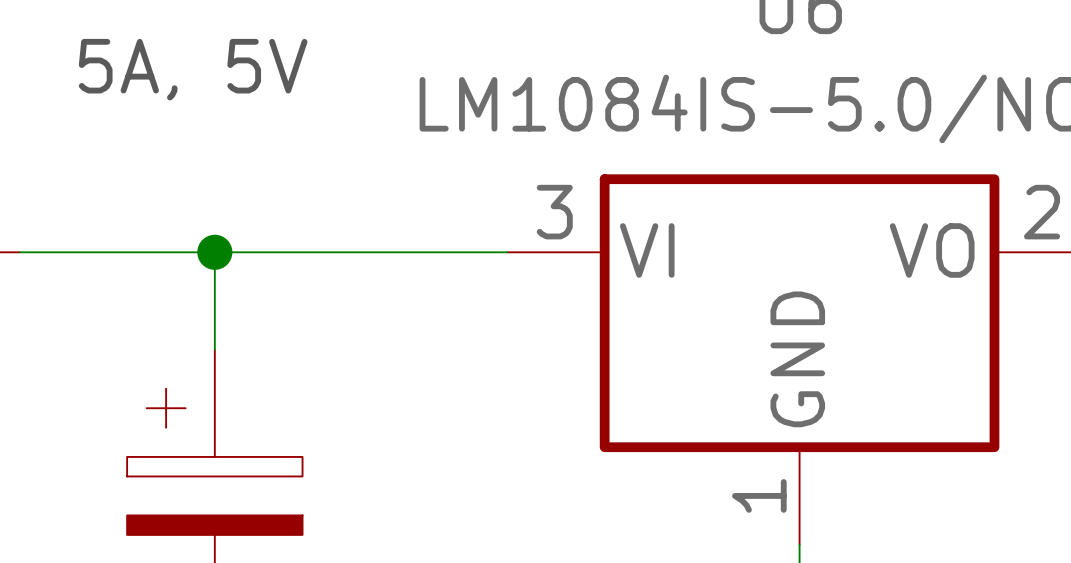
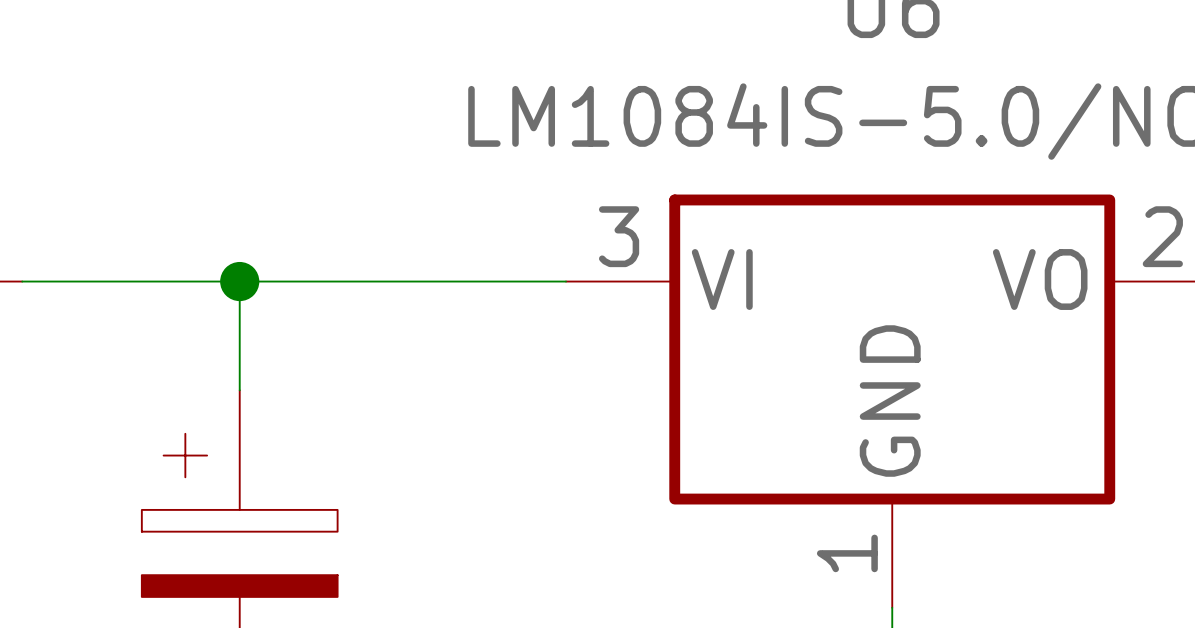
text: 5A, 5V (193, 69) -> none

